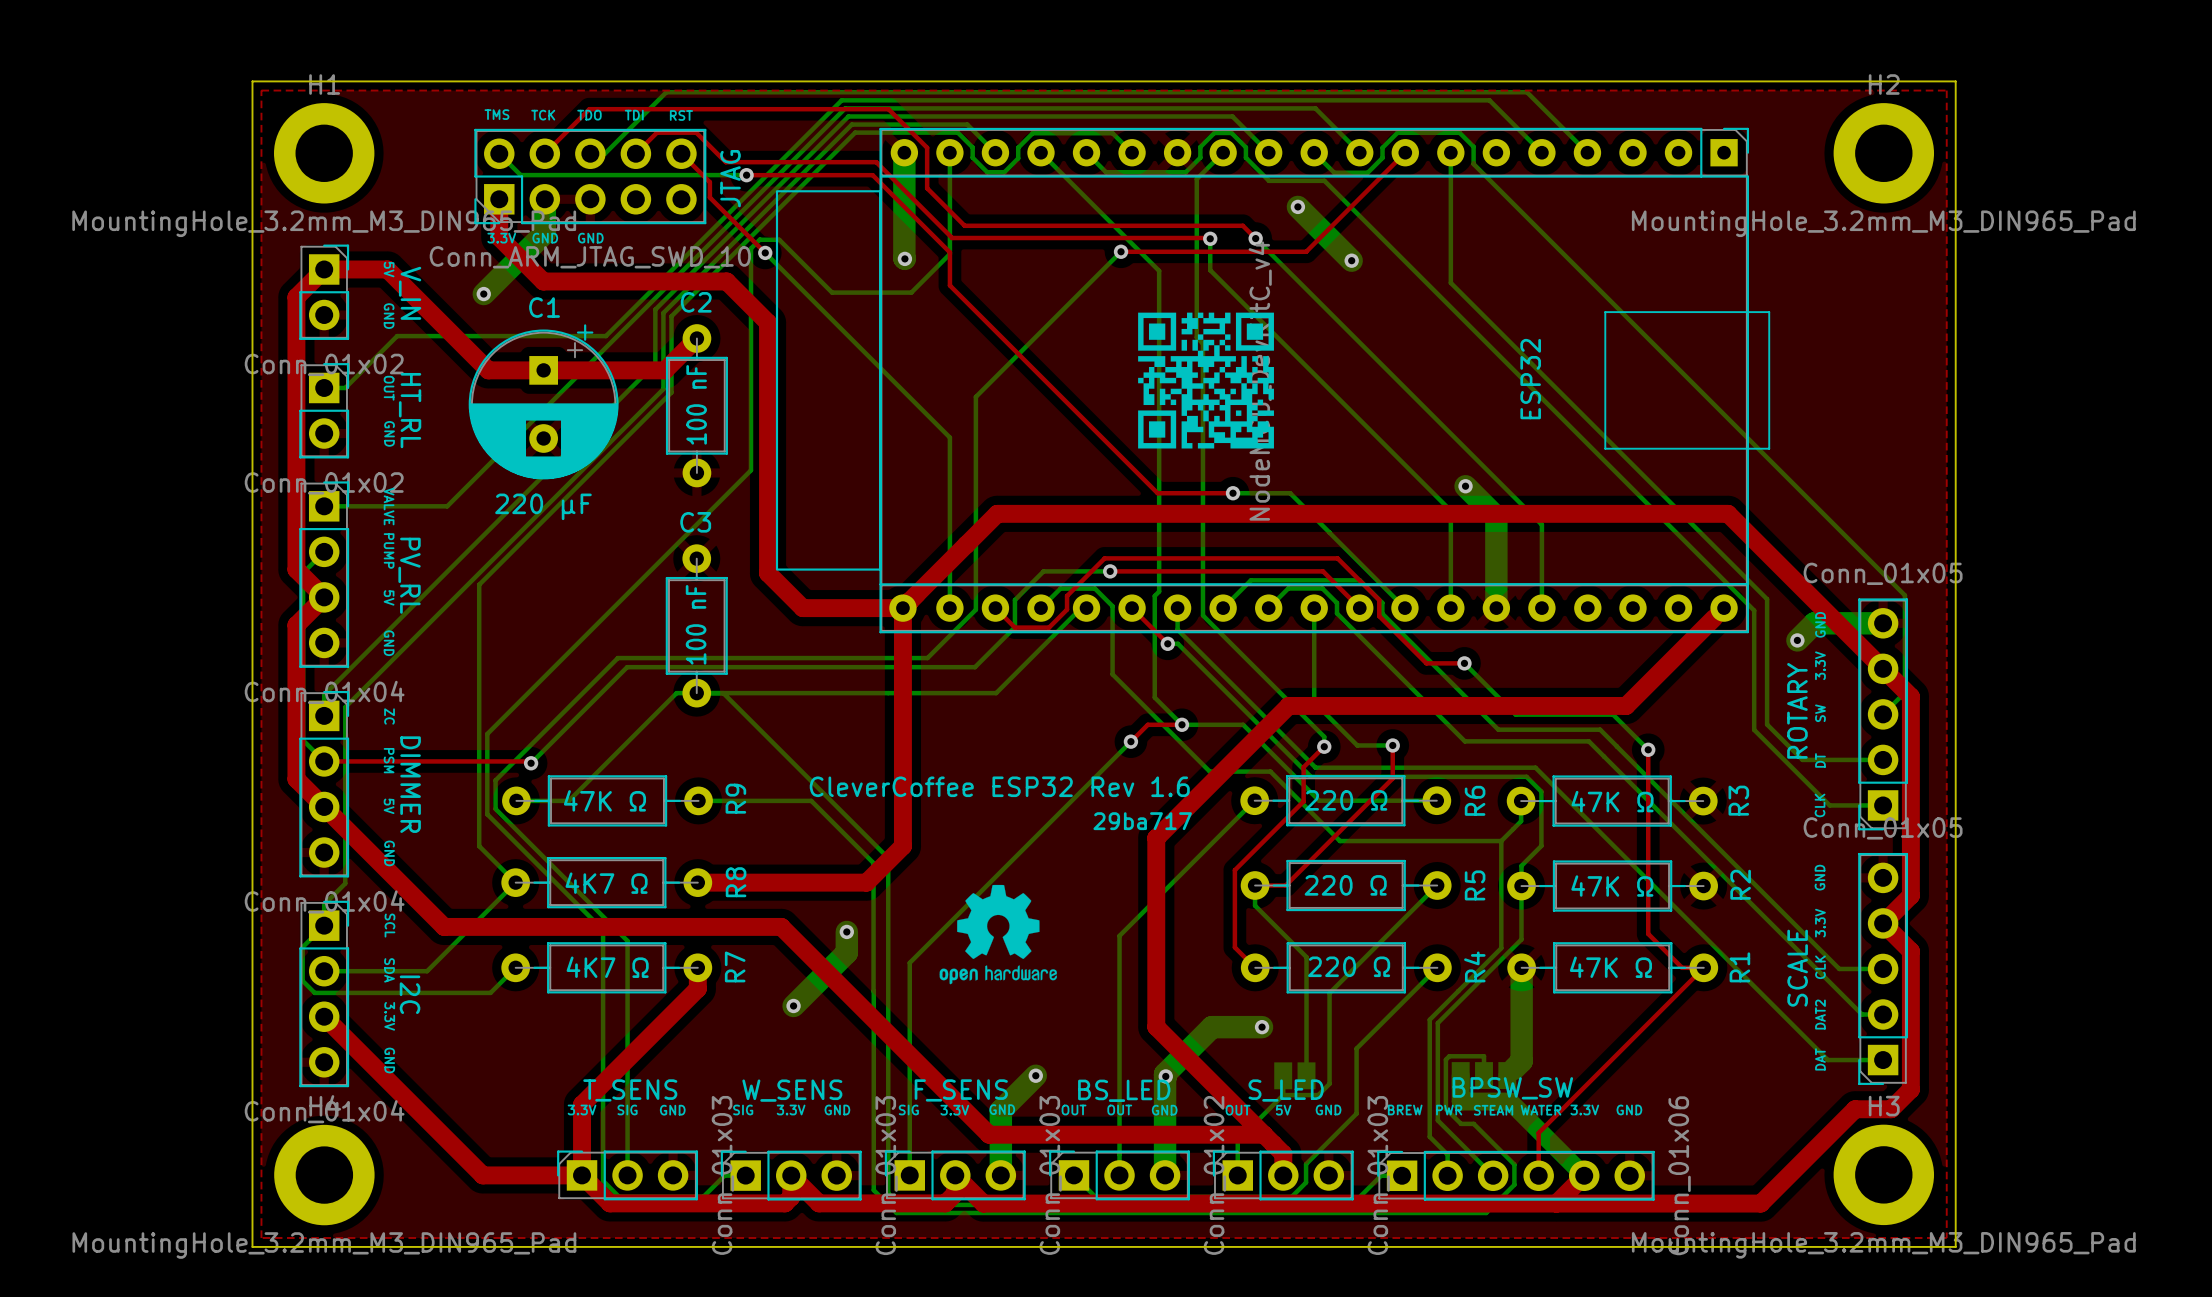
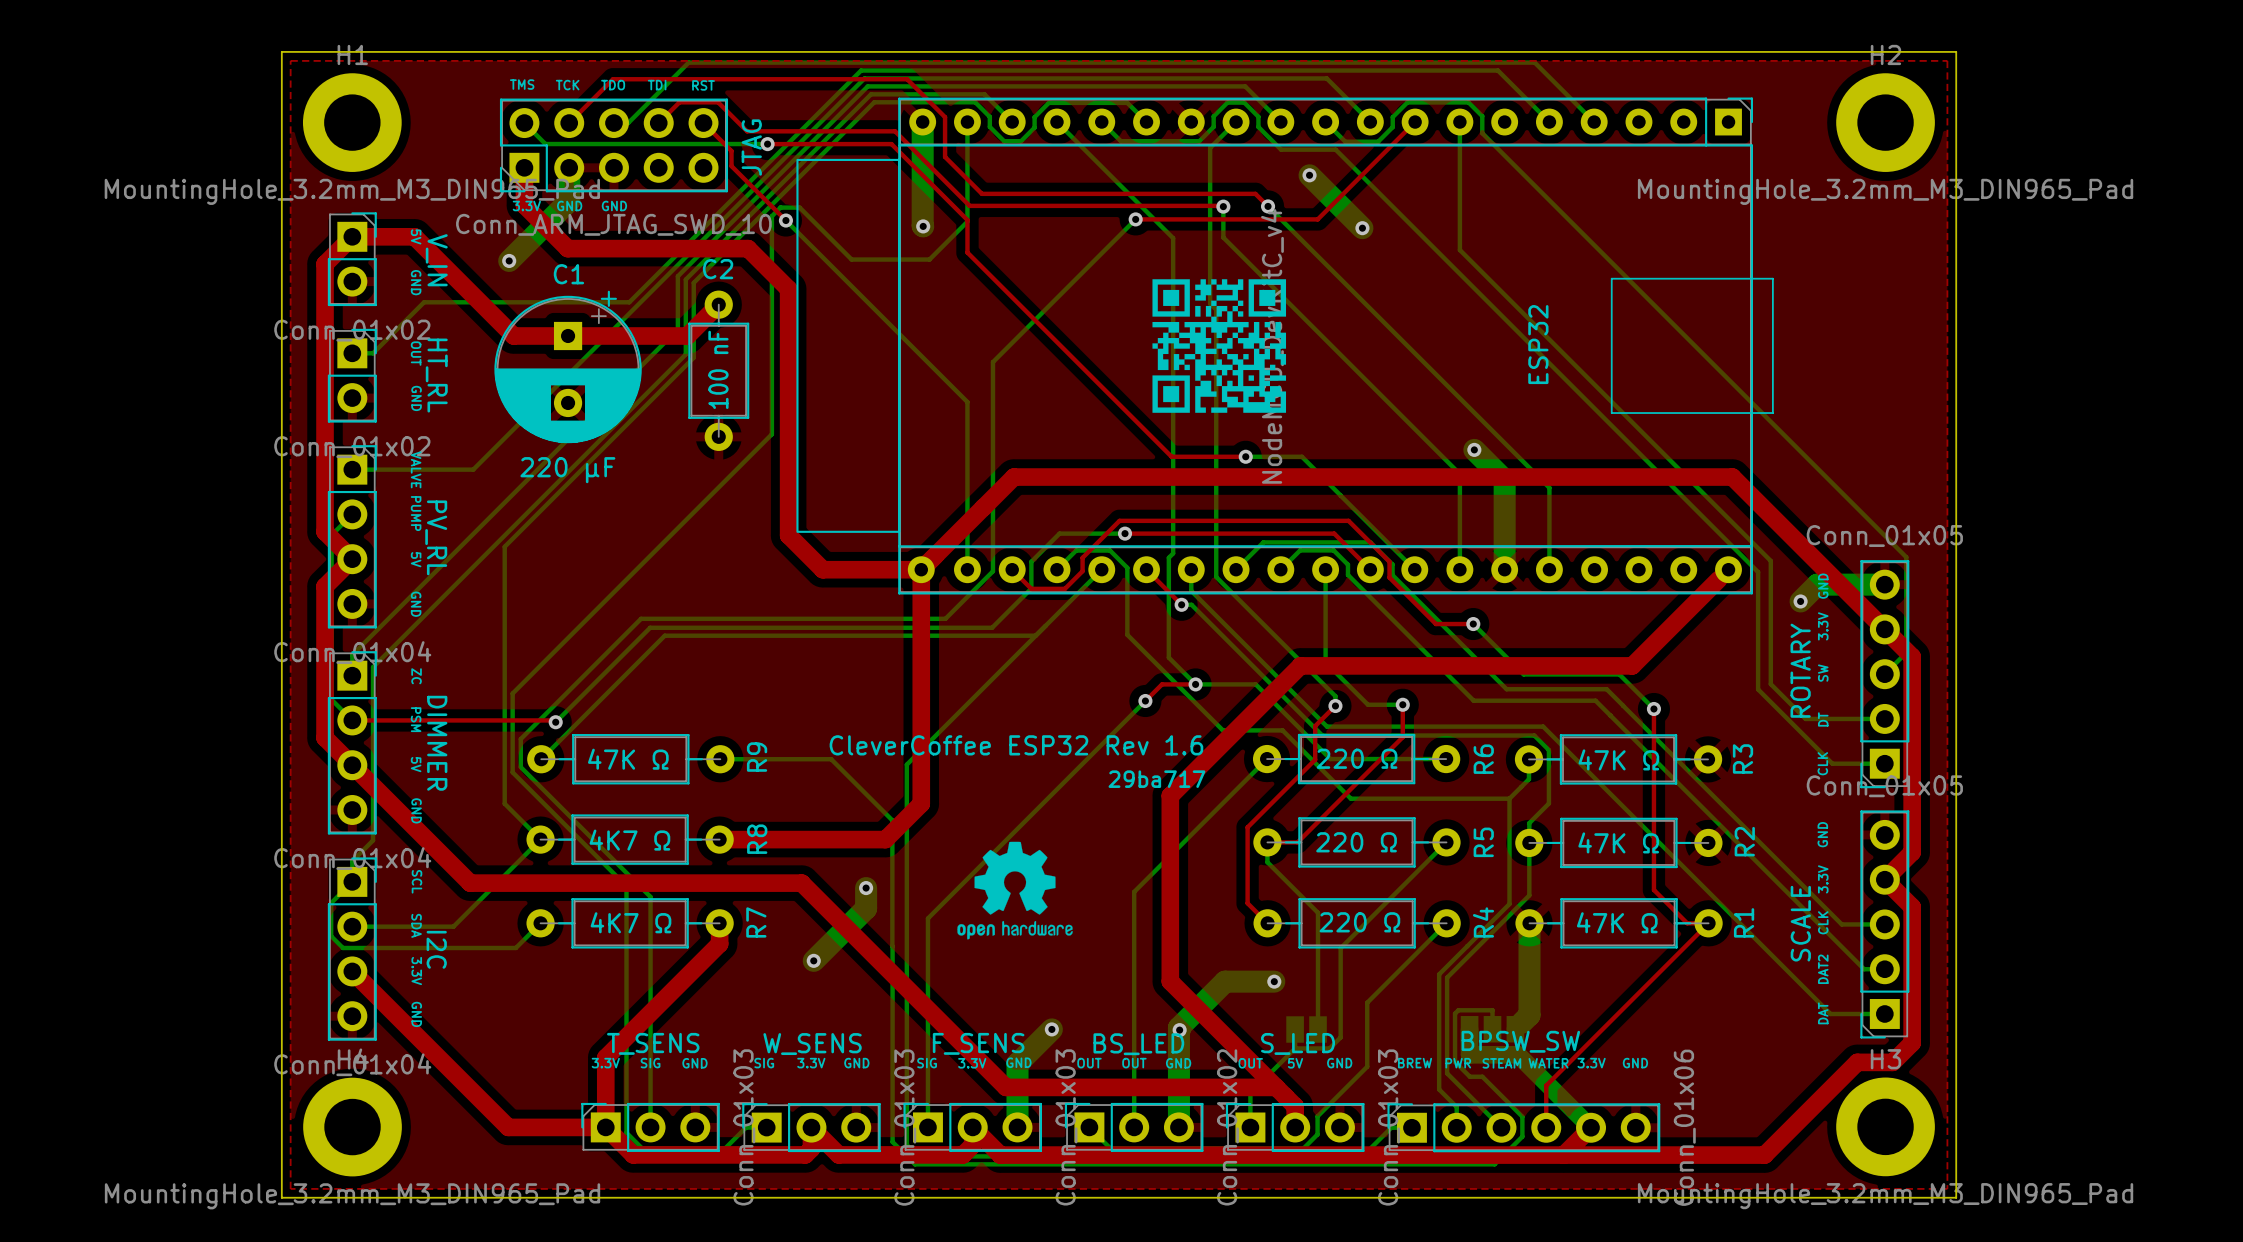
bottom track: (1081, 608) (996, 693) (676, 693) (568, 800) (516, 800) -> (1035, 635) (664, 635) (541, 759)
C3: 100 nF (696, 625) -> none
bottom track: (723, 693) (888, 858) -> (1101, 569) (906, 764) (906, 815)

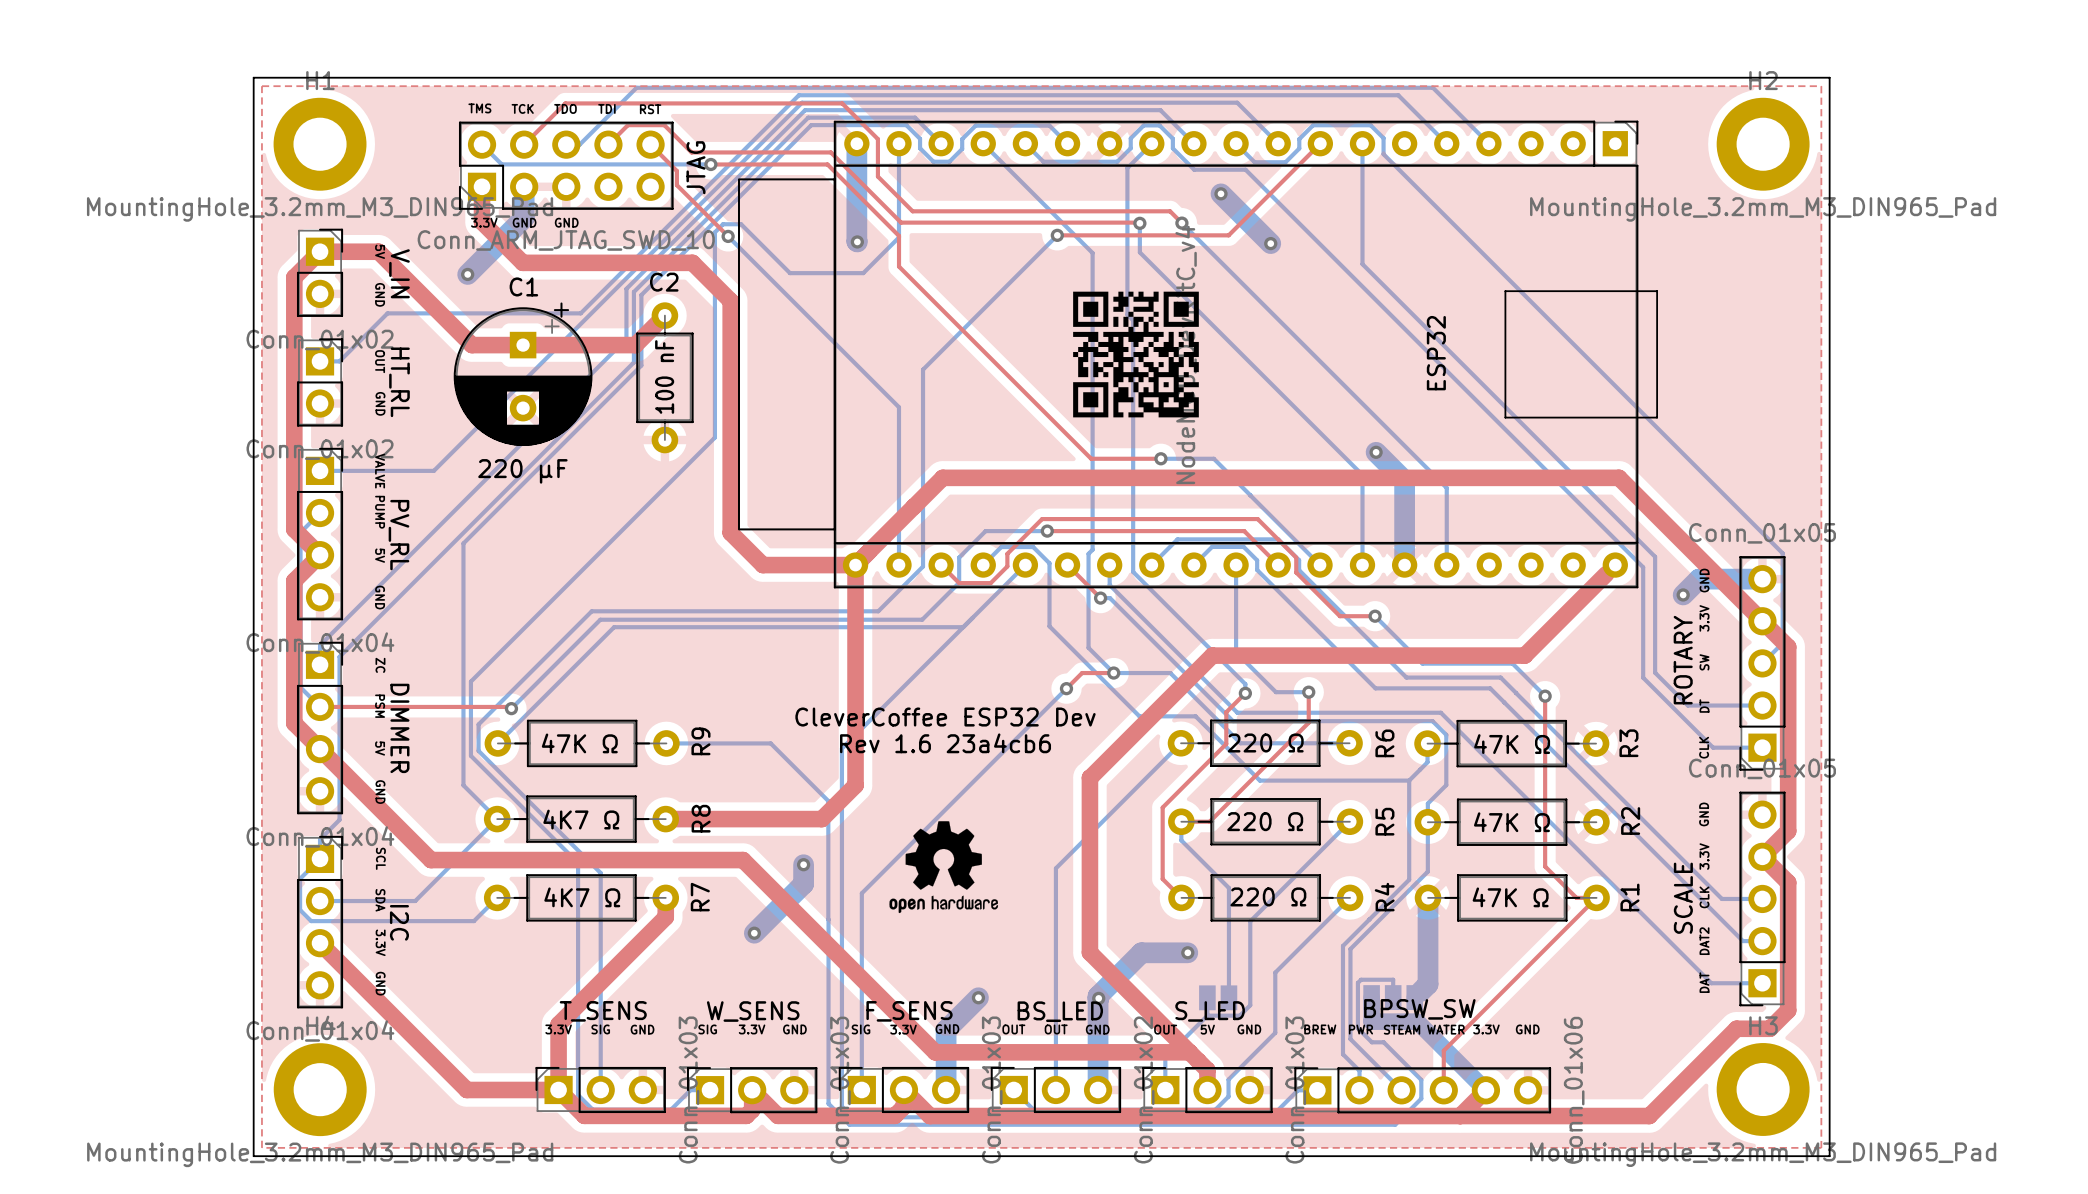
text: CleverCoffee ESP32 Rev 1.6 (1016, 745) -> CleverCoffee ESP32 Dev (945, 717)
text: none -> Rev 1.6 23a4cb6 (945, 743)
text: 29ba717 (1156, 779) -> none

